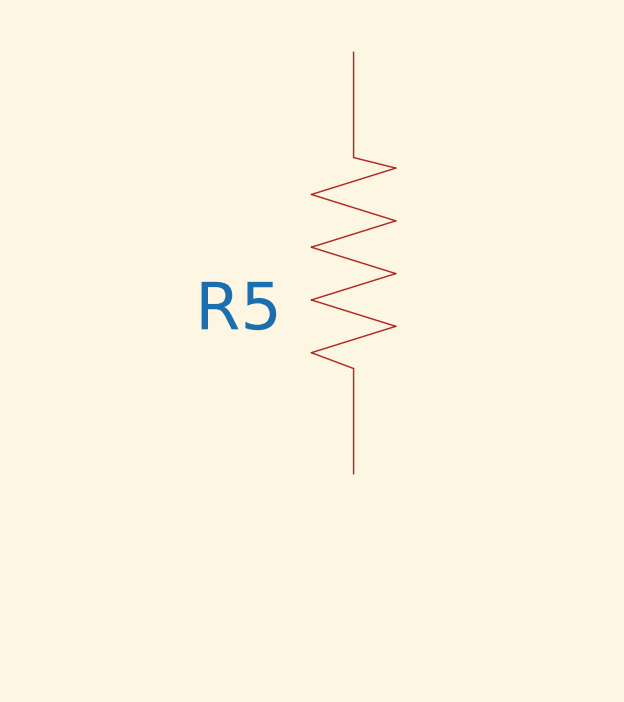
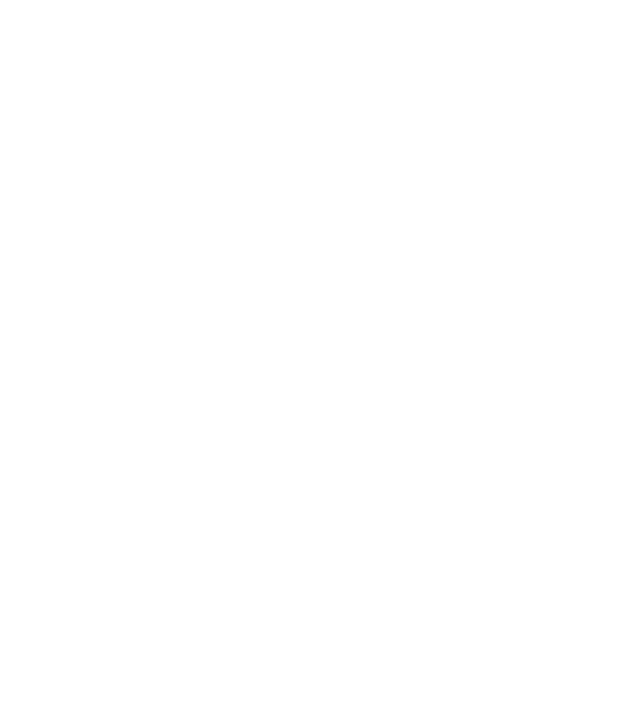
R5: (353, 263) -> none

